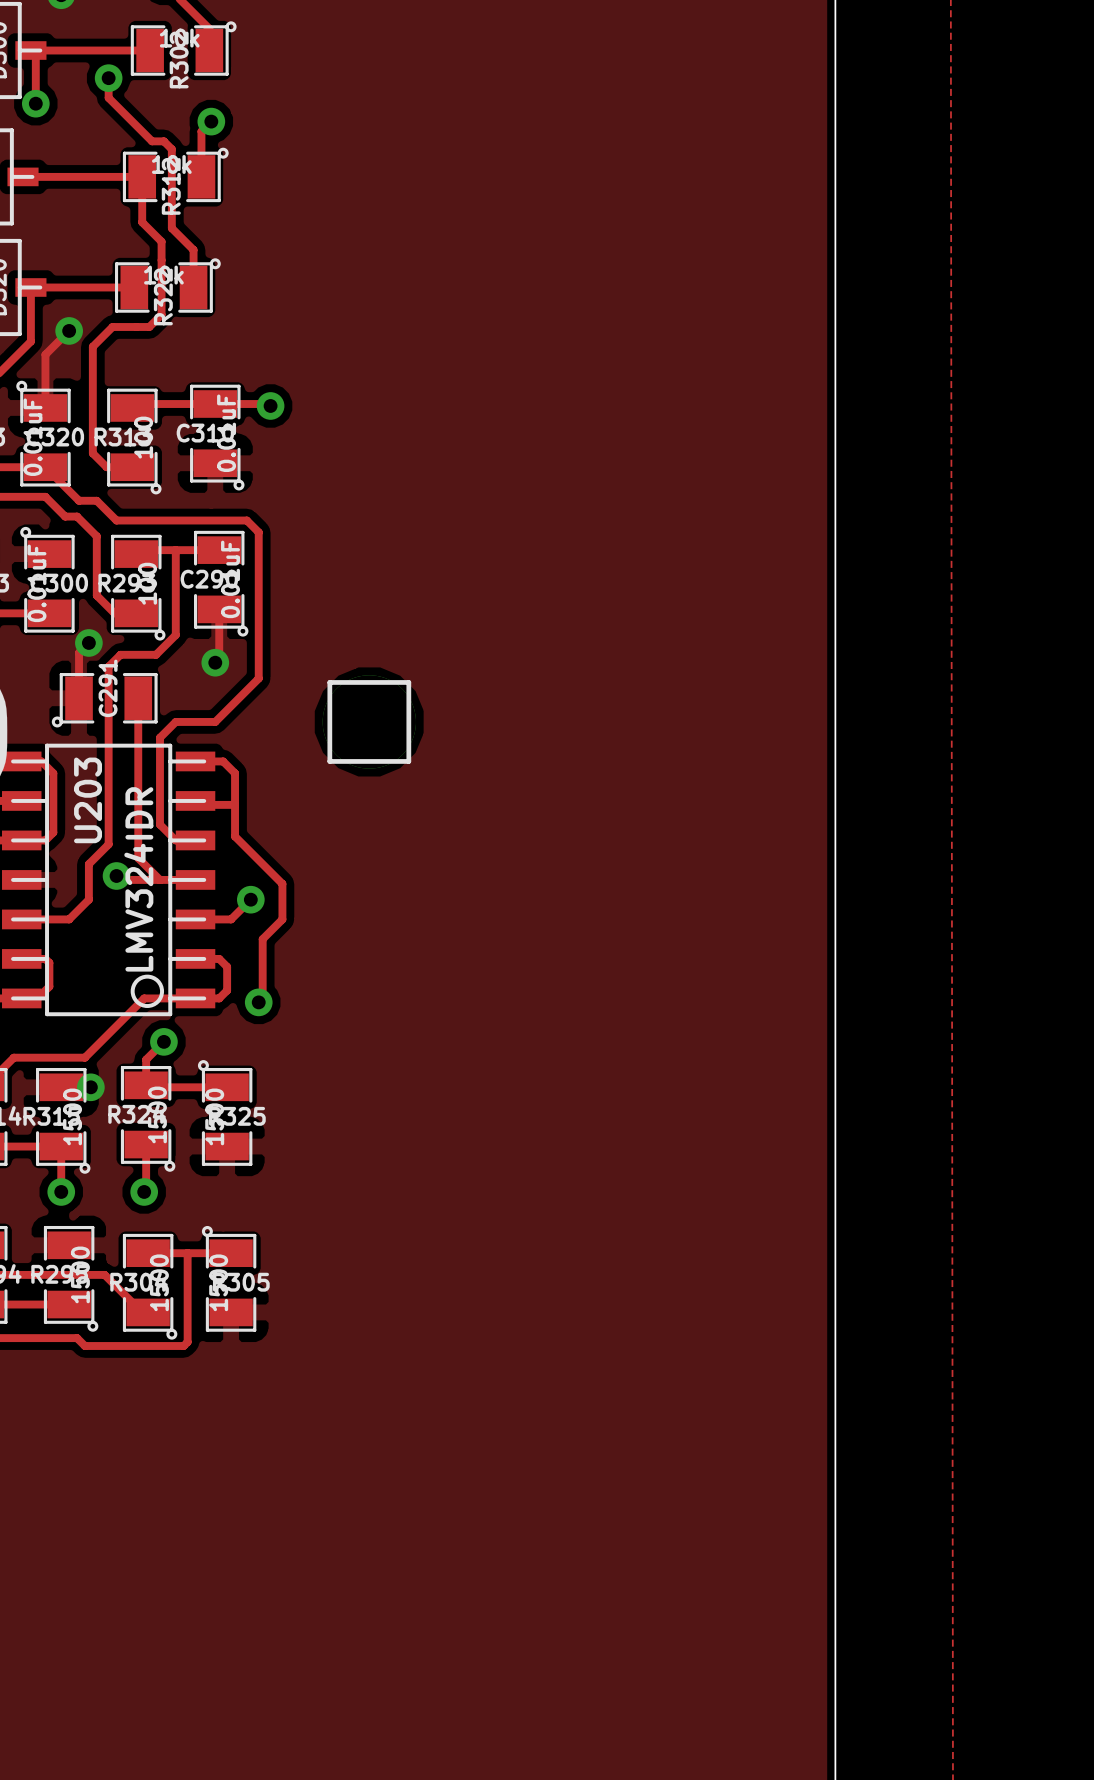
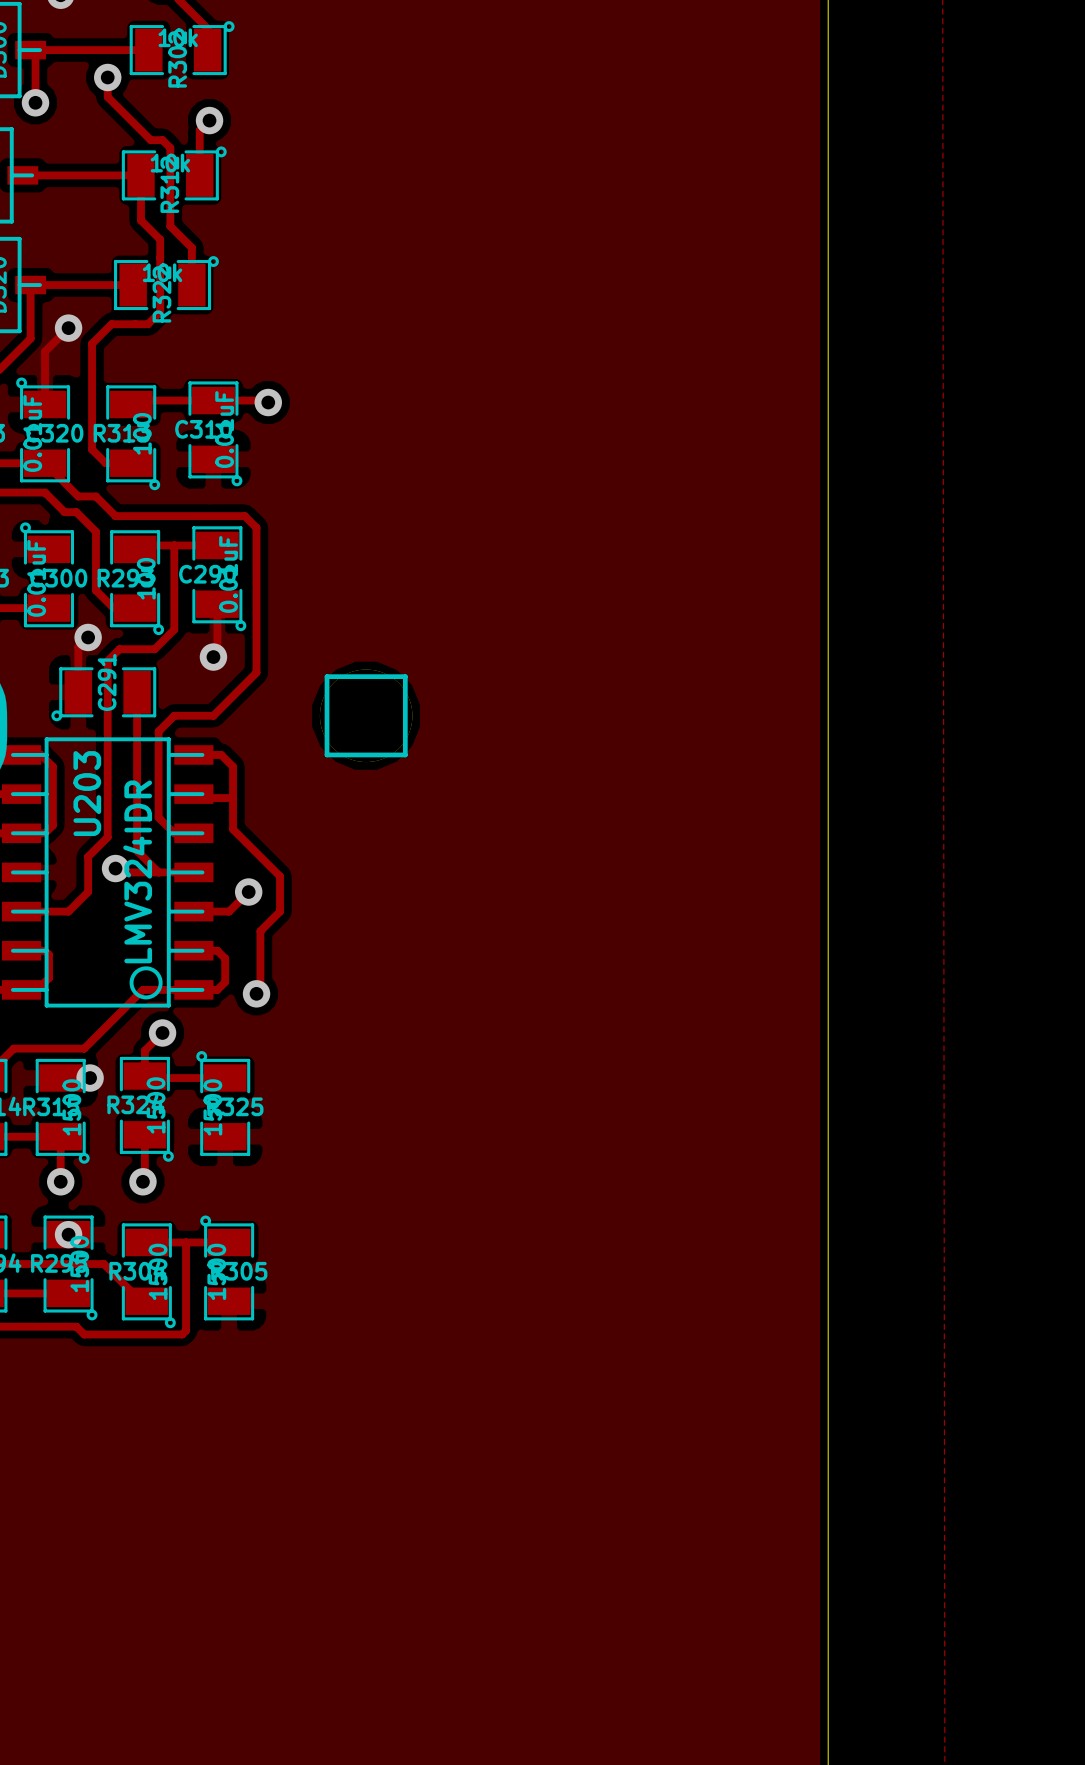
via: none -> (68, 1234)

